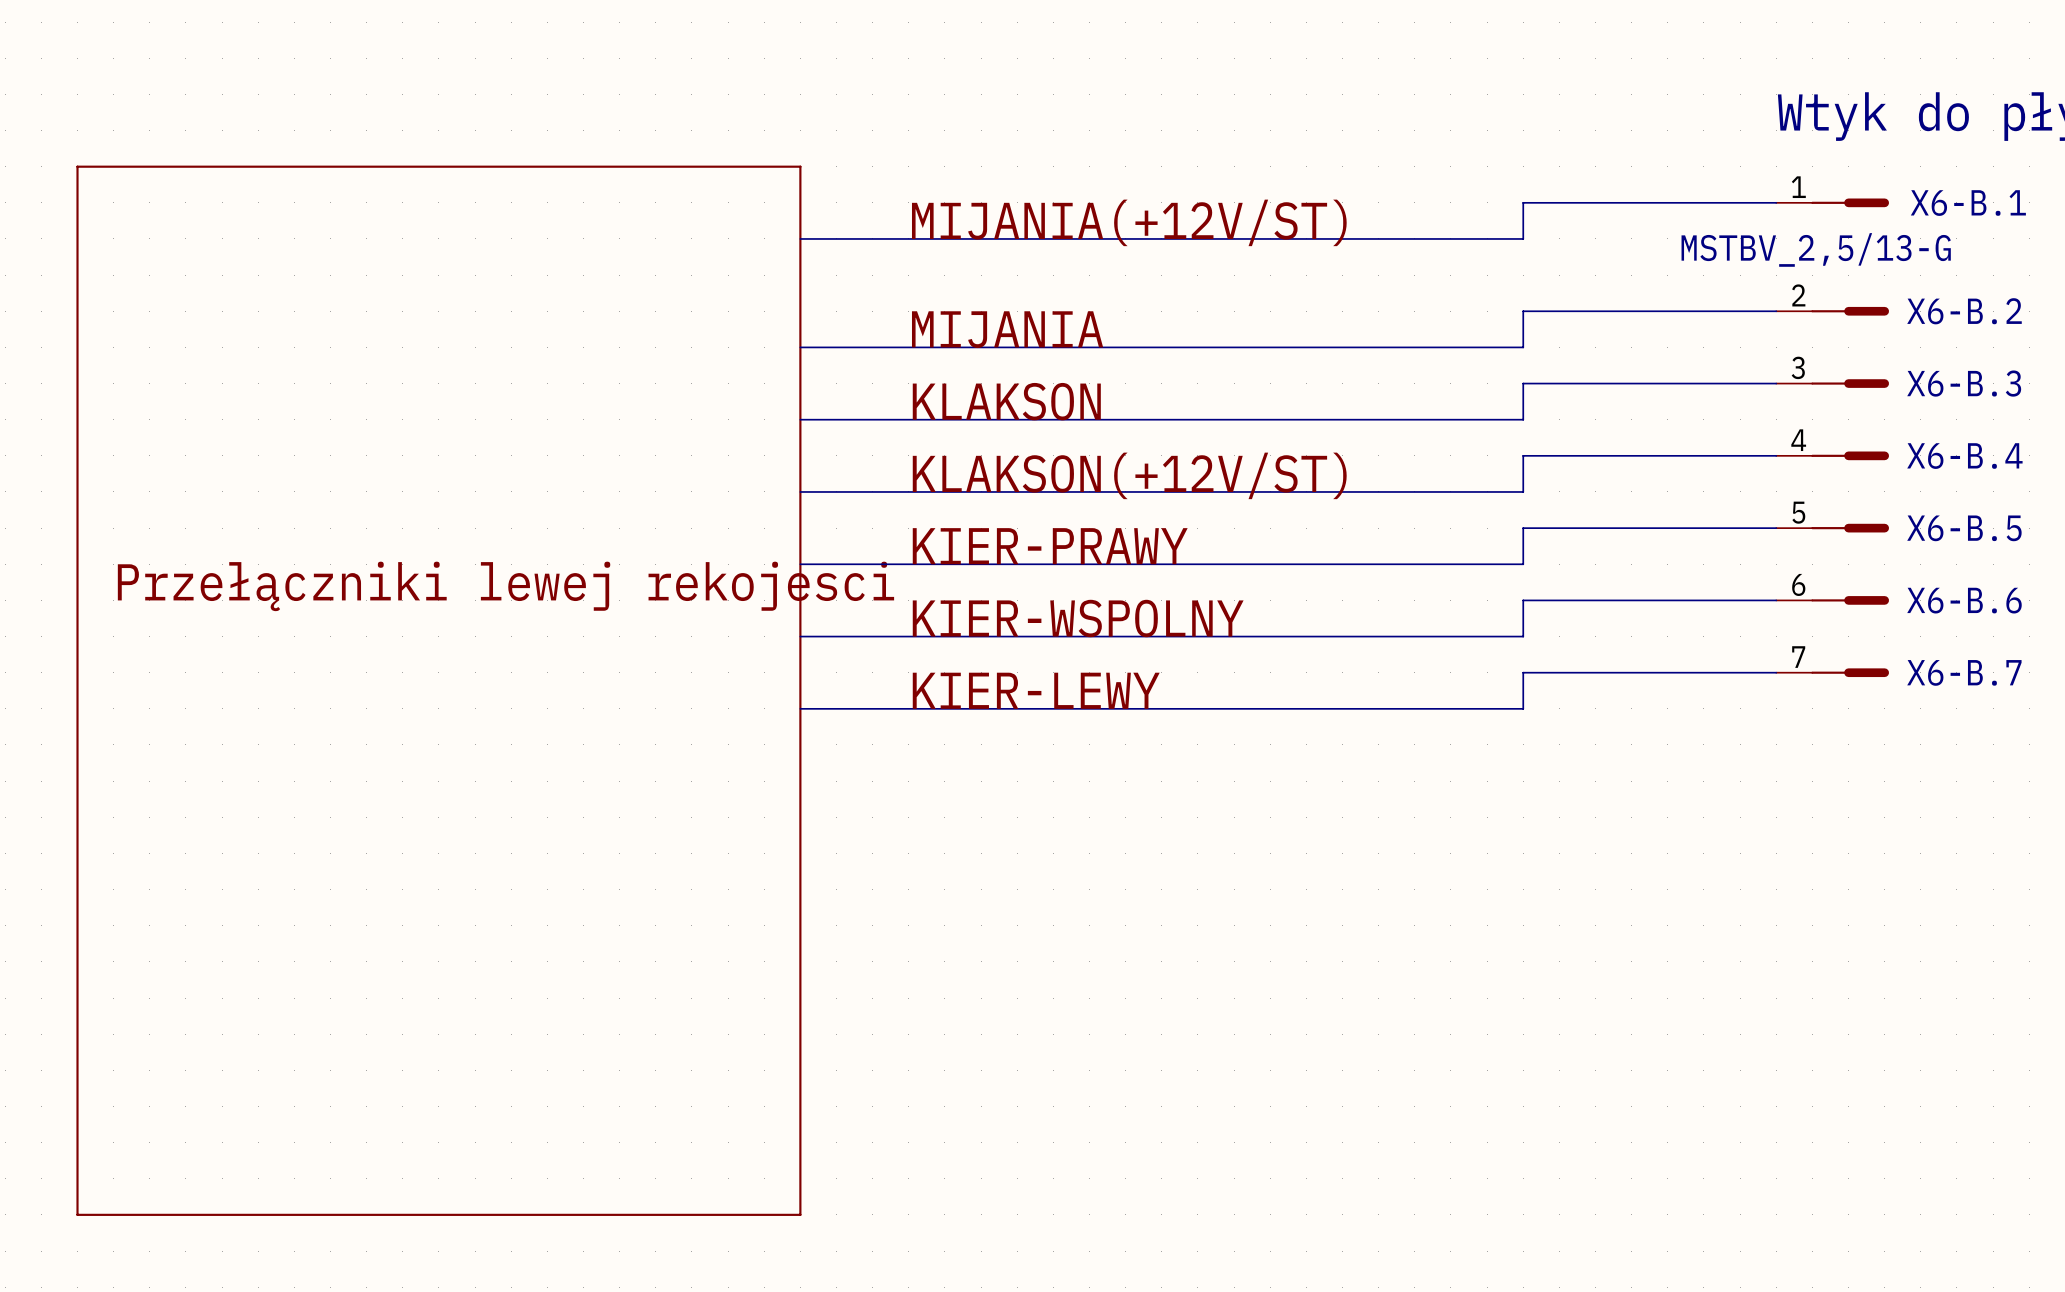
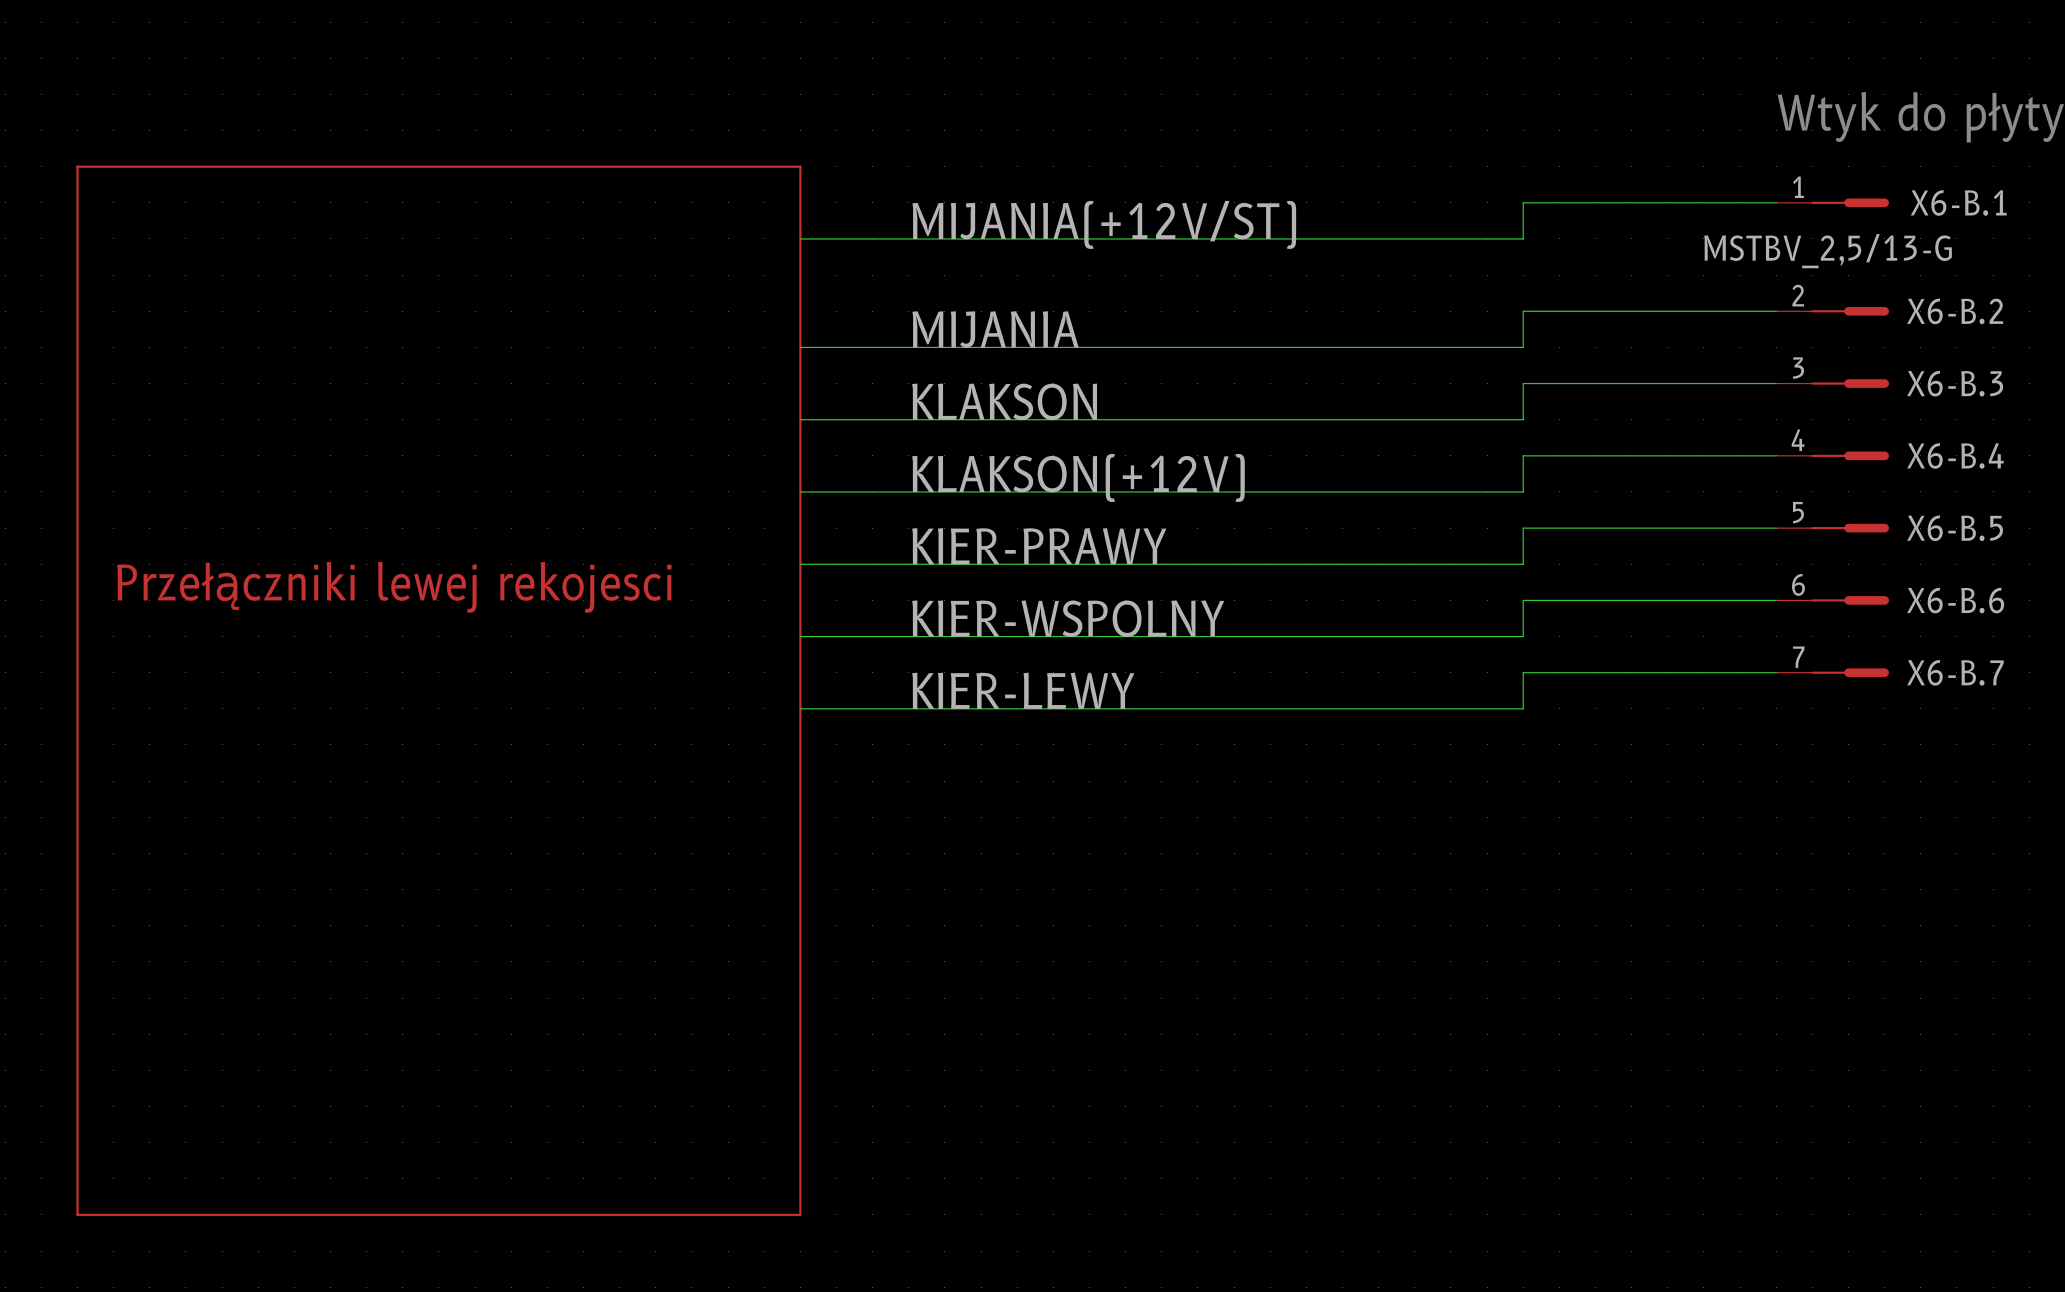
label: KLAKSON(+12V/ST) (1129, 475) -> KLAKSON(+12V) (1078, 477)

